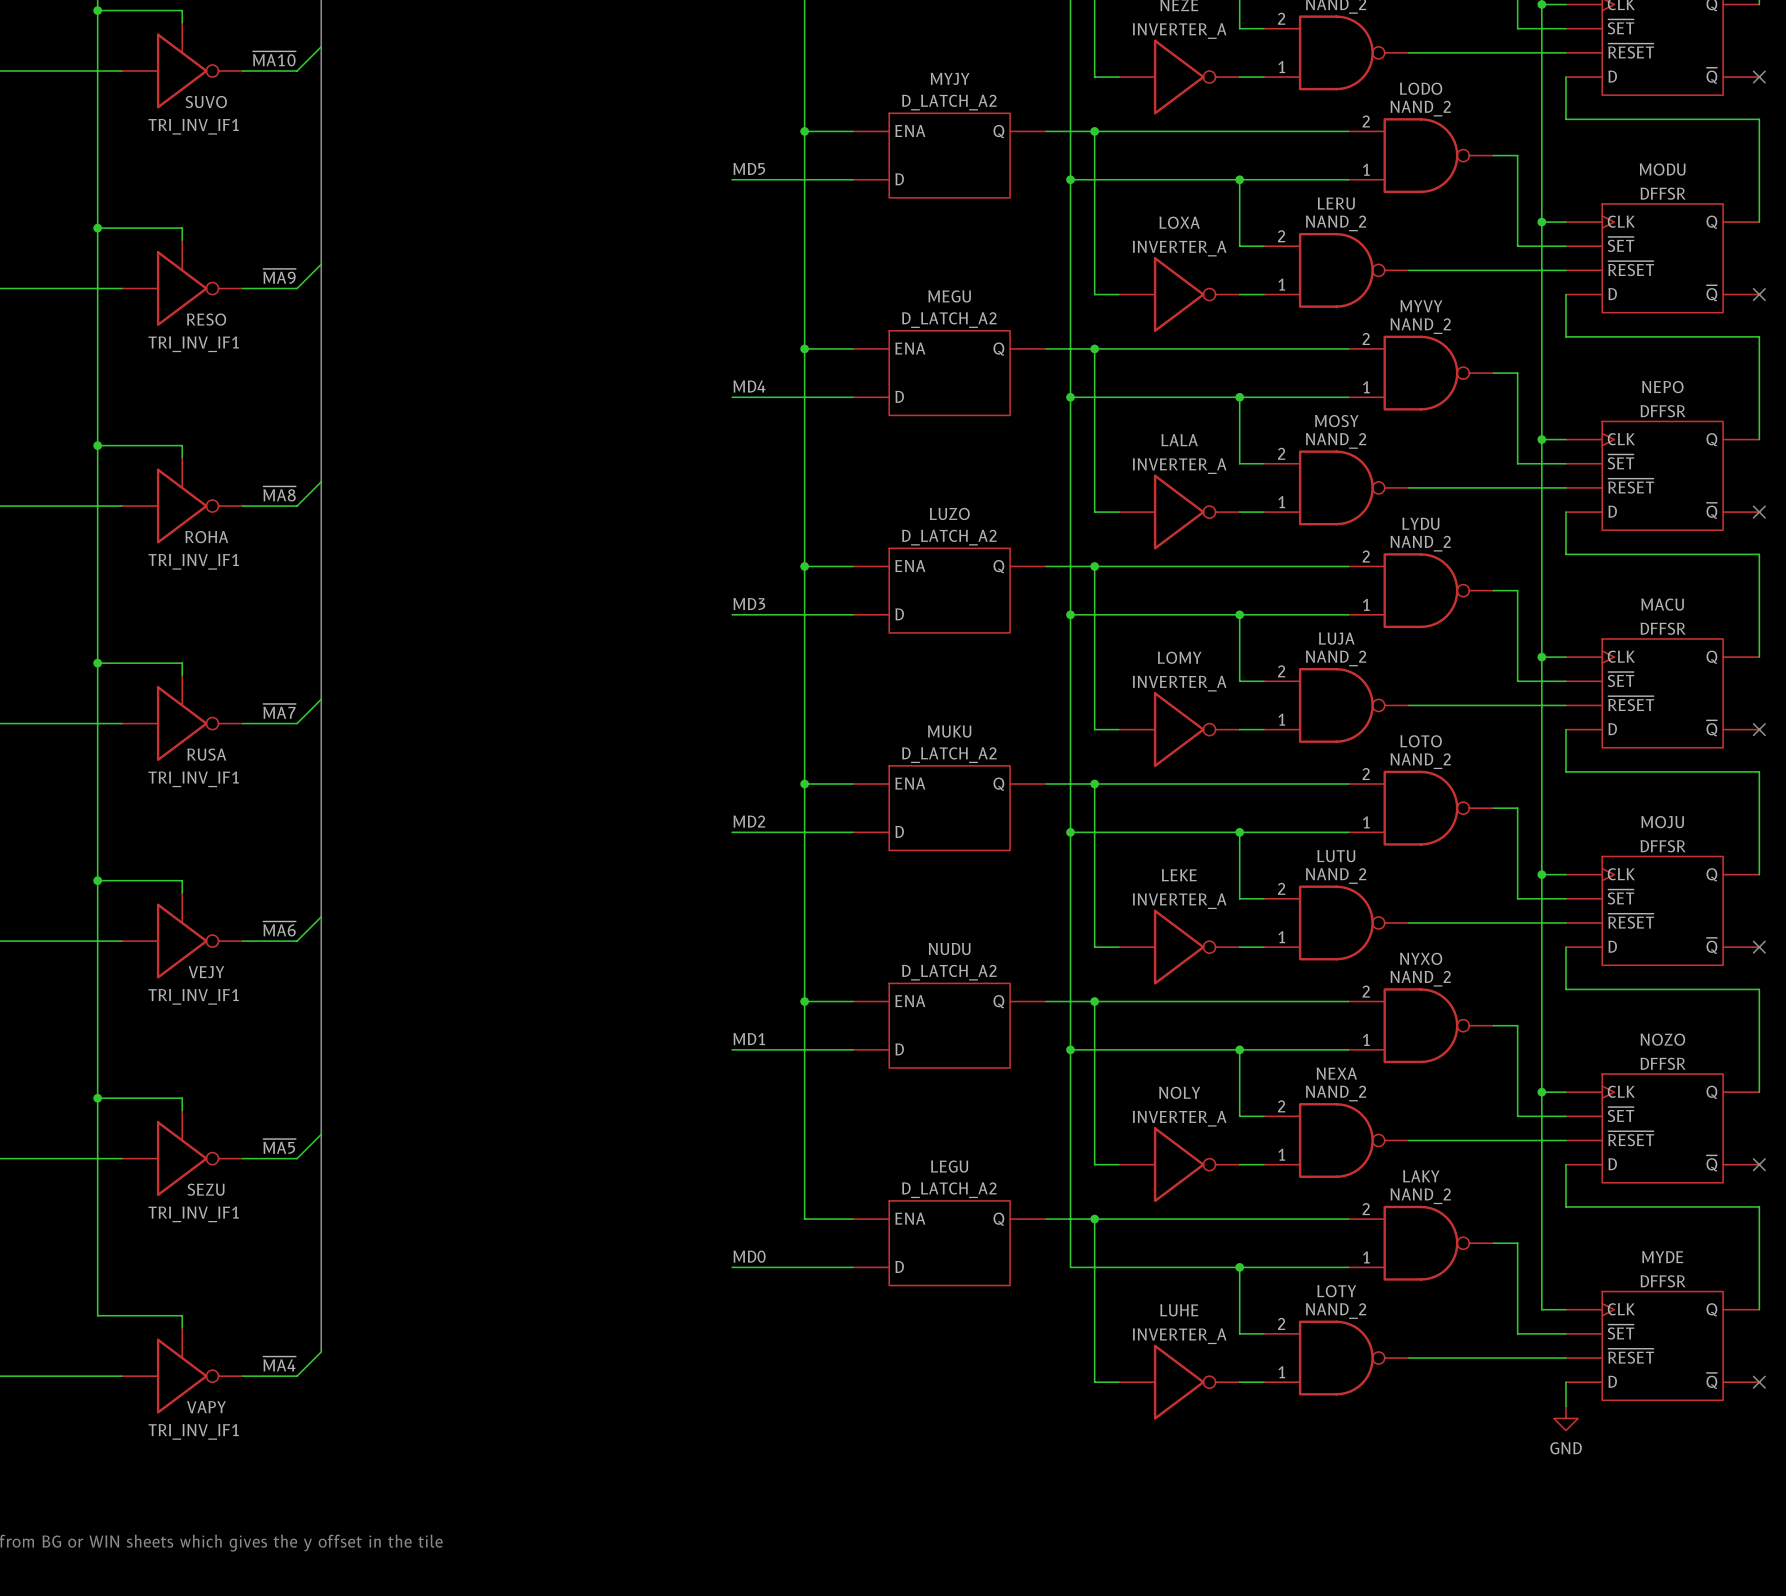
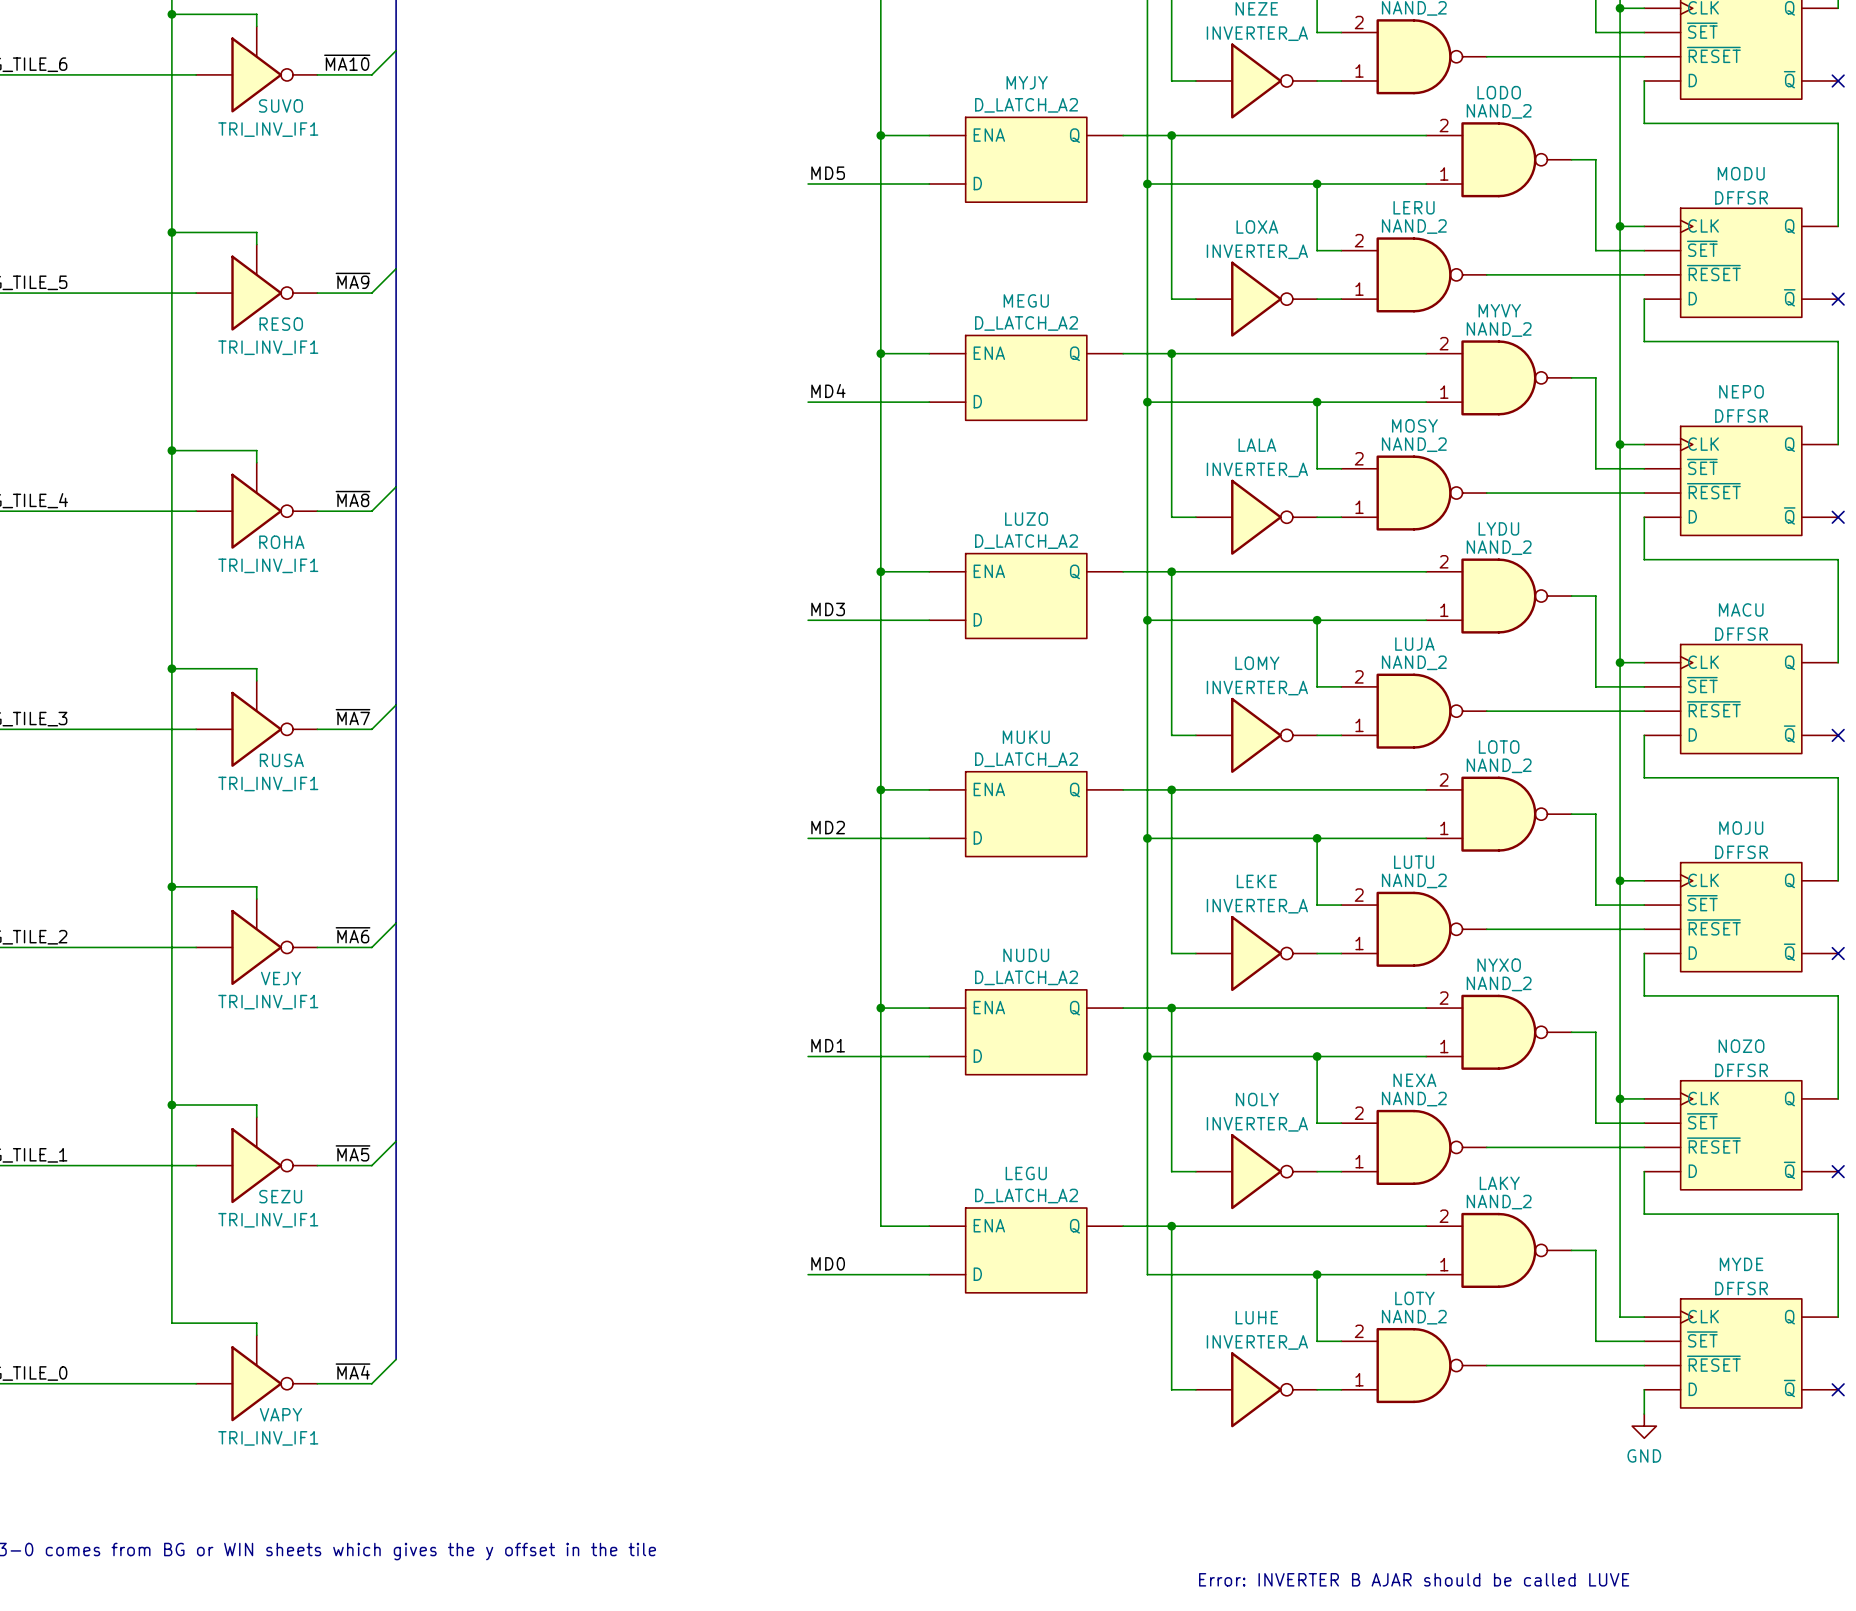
text: none -> Error: INVERTER B AJAR should be called LUVE (1414, 1579)

